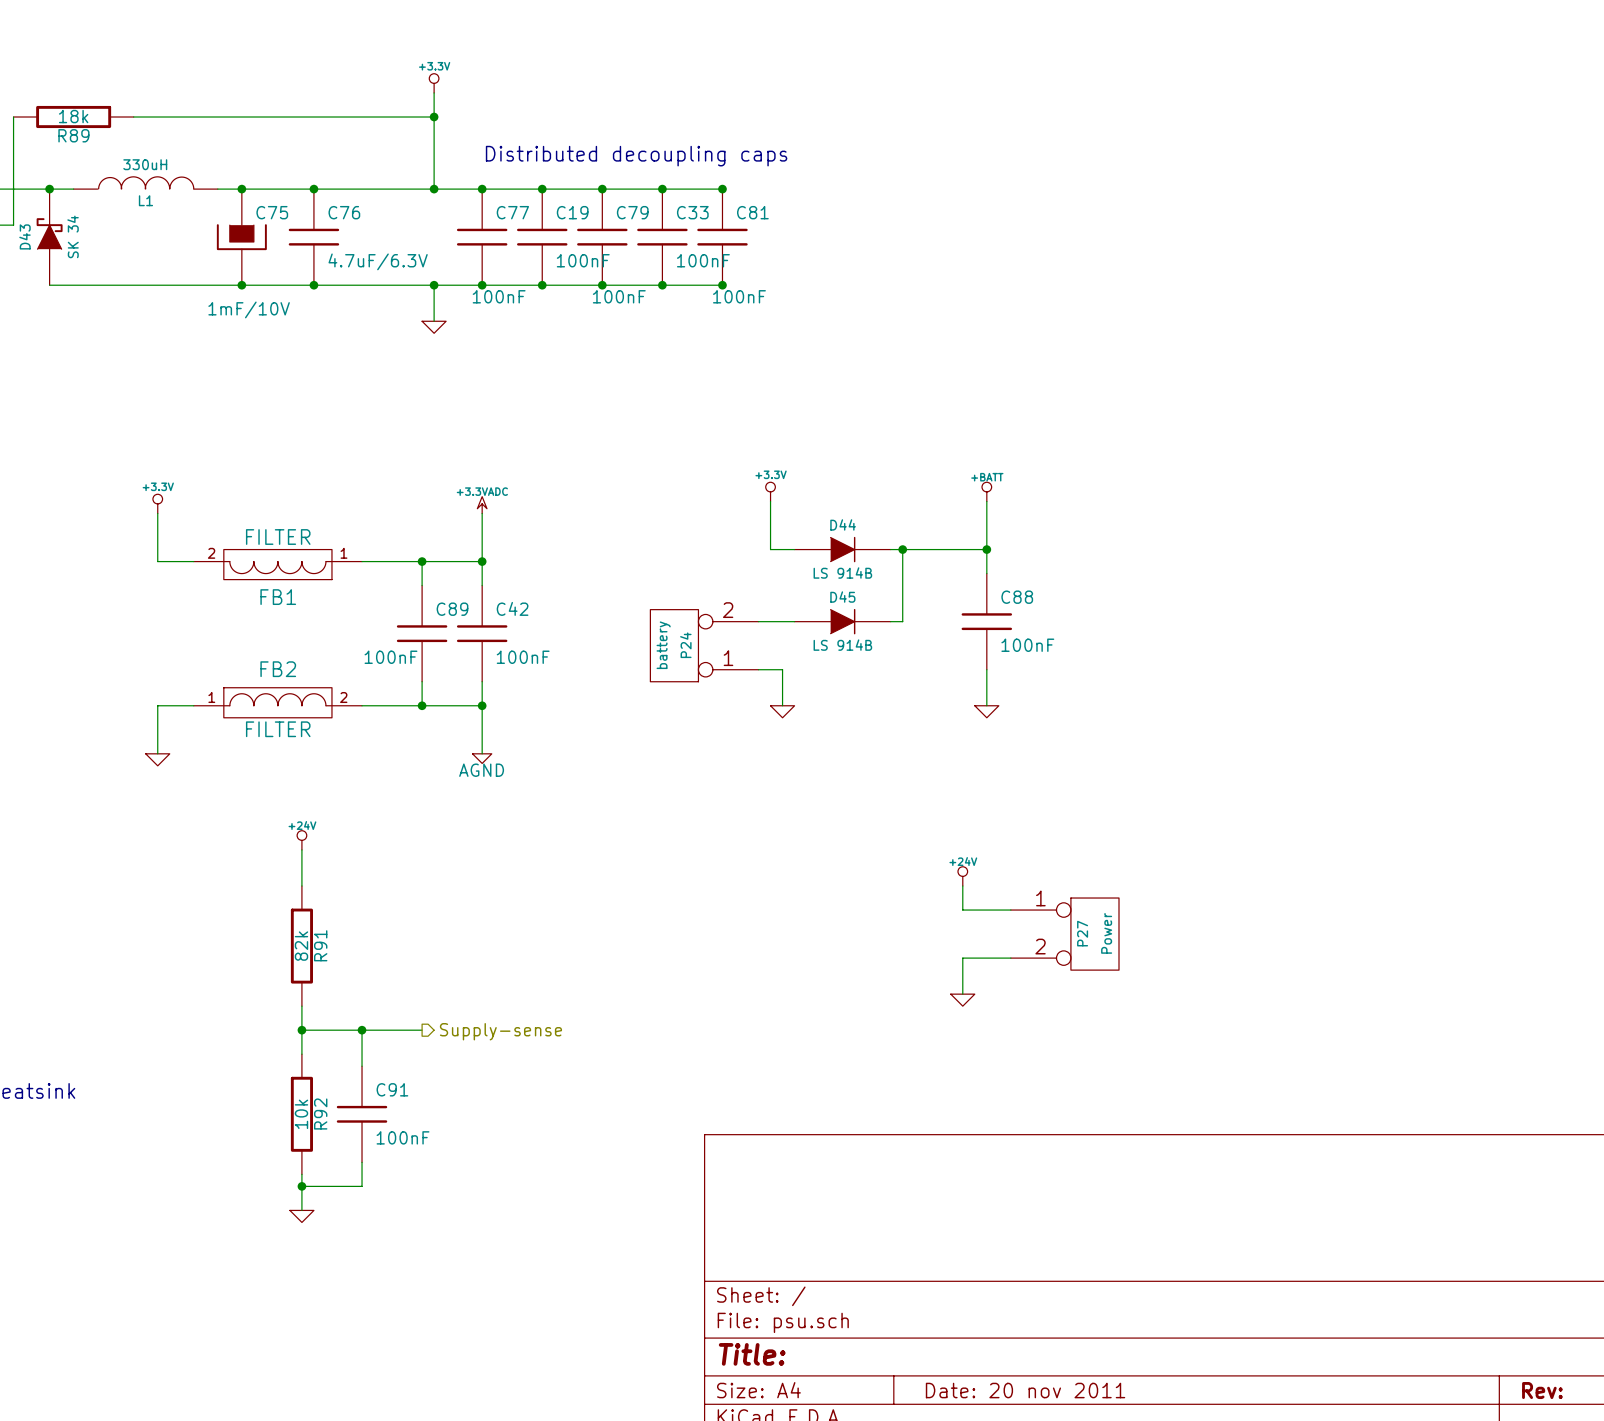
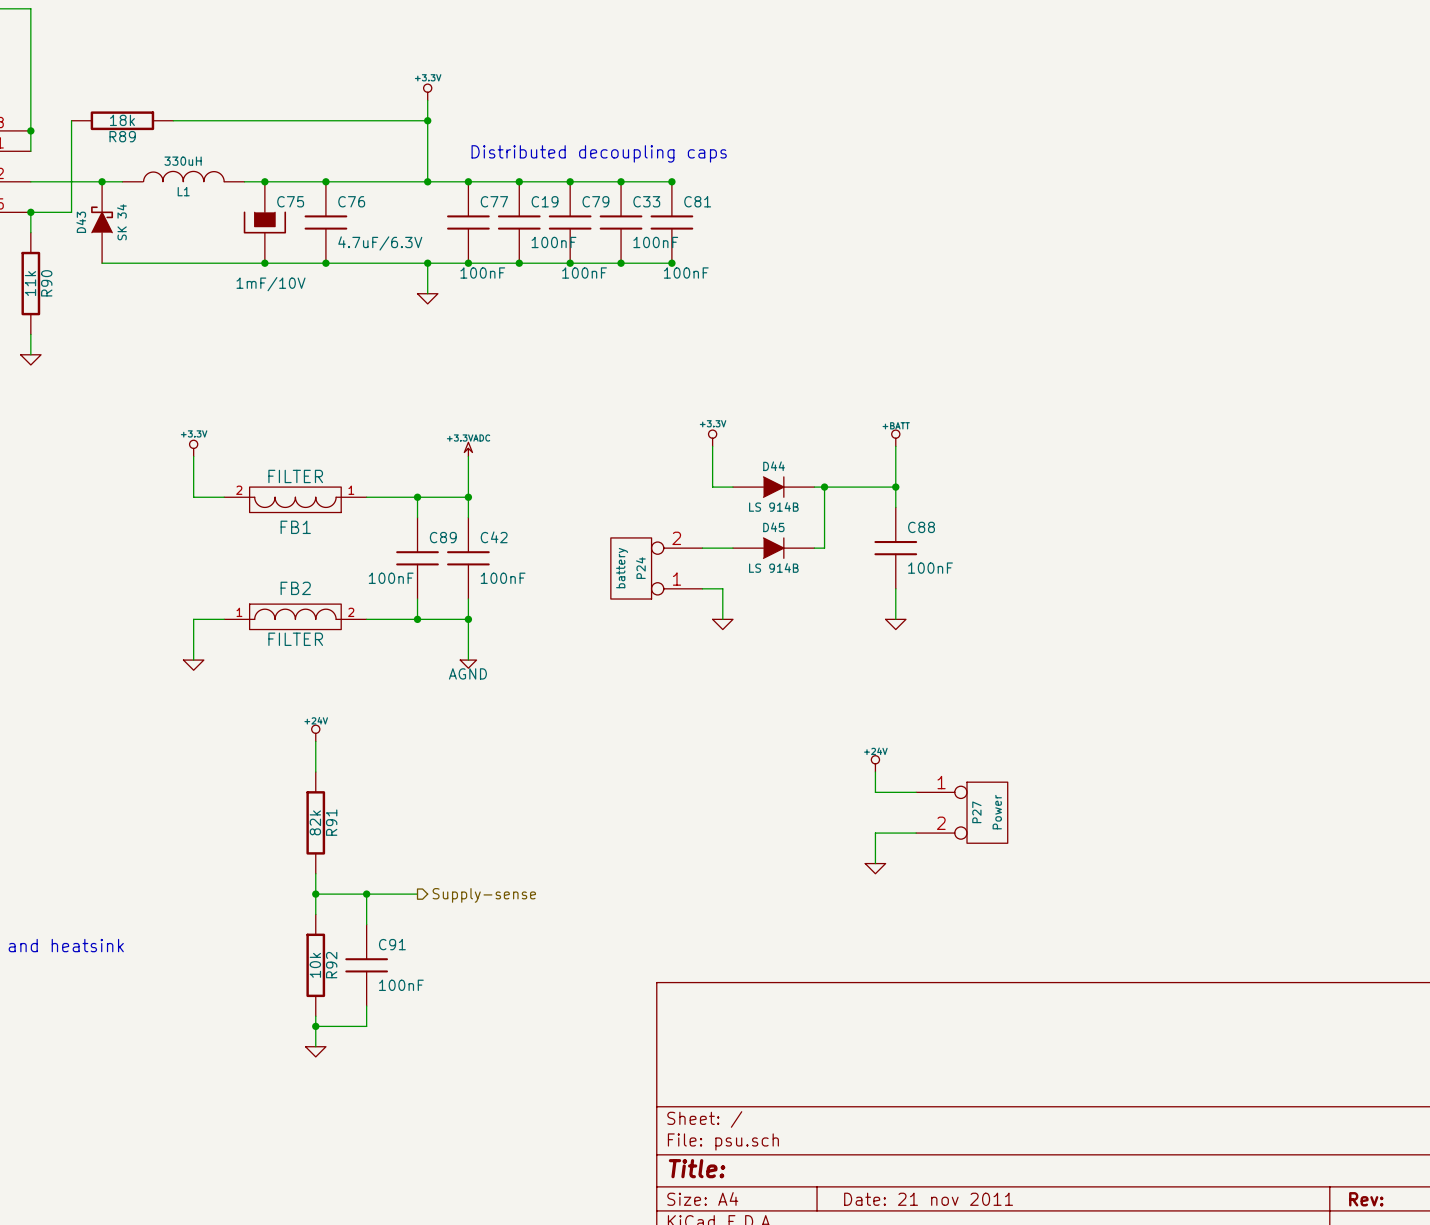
title block: Date: 20 nov 2011 (1025, 1390) -> Date: 21 nov 2011 (928, 1199)

